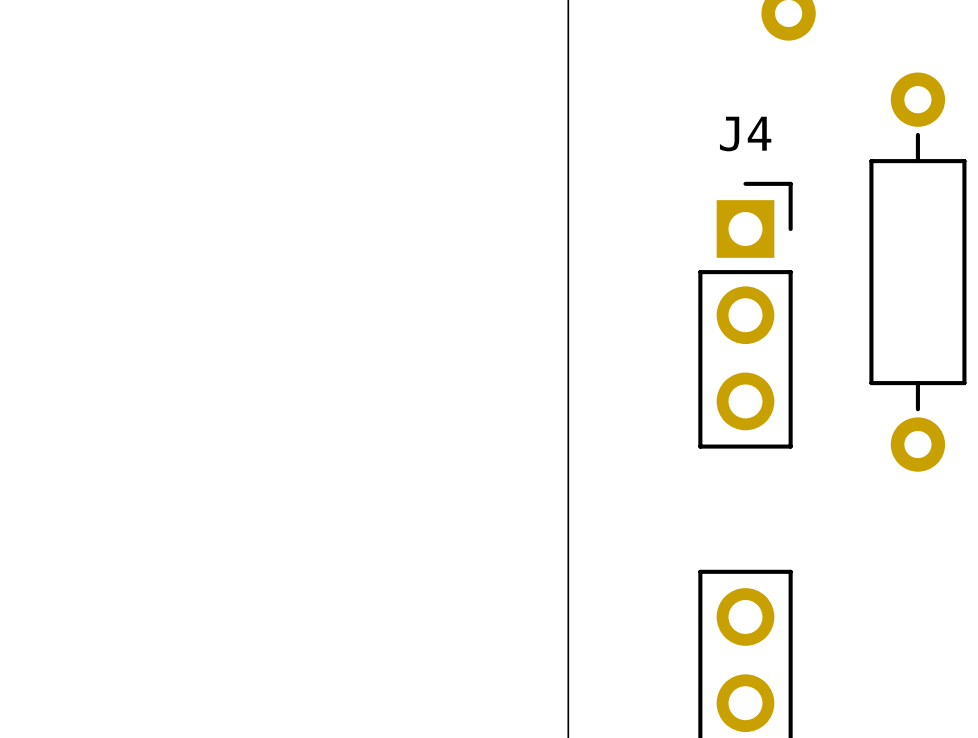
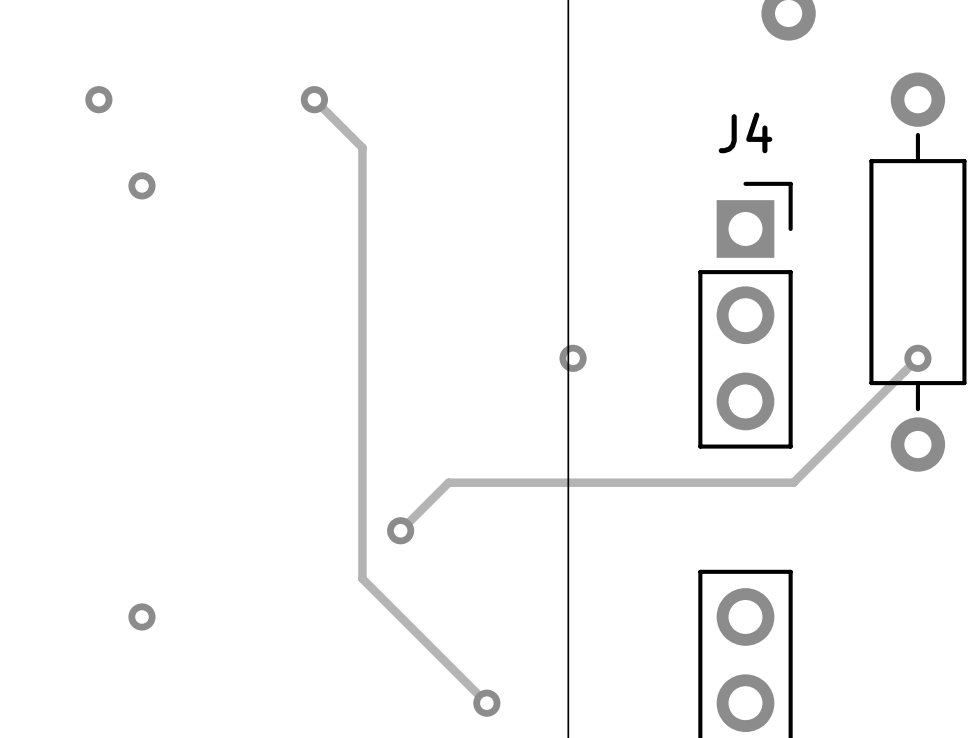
via: none -> (98, 99)
track: none -> (314, 99) (362, 147) (362, 578) (486, 703)
via: none -> (314, 99)
via: none -> (141, 185)
via: none -> (573, 358)
track: none -> (917, 358) (793, 482) (448, 482) (400, 530)
via: none -> (917, 358)
via: none -> (400, 530)
via: none -> (141, 616)
via: none -> (486, 703)

